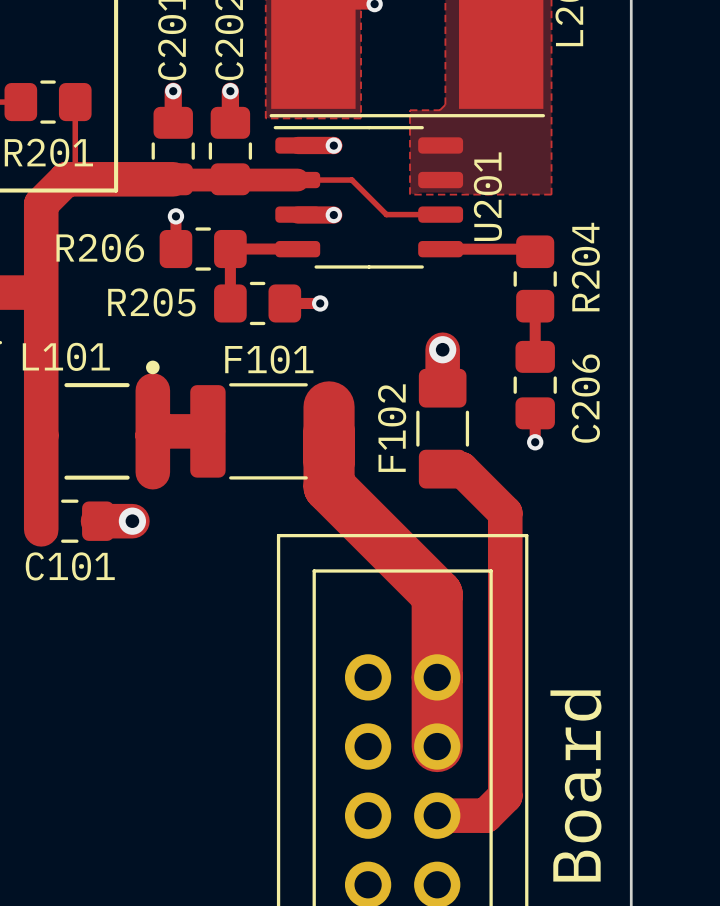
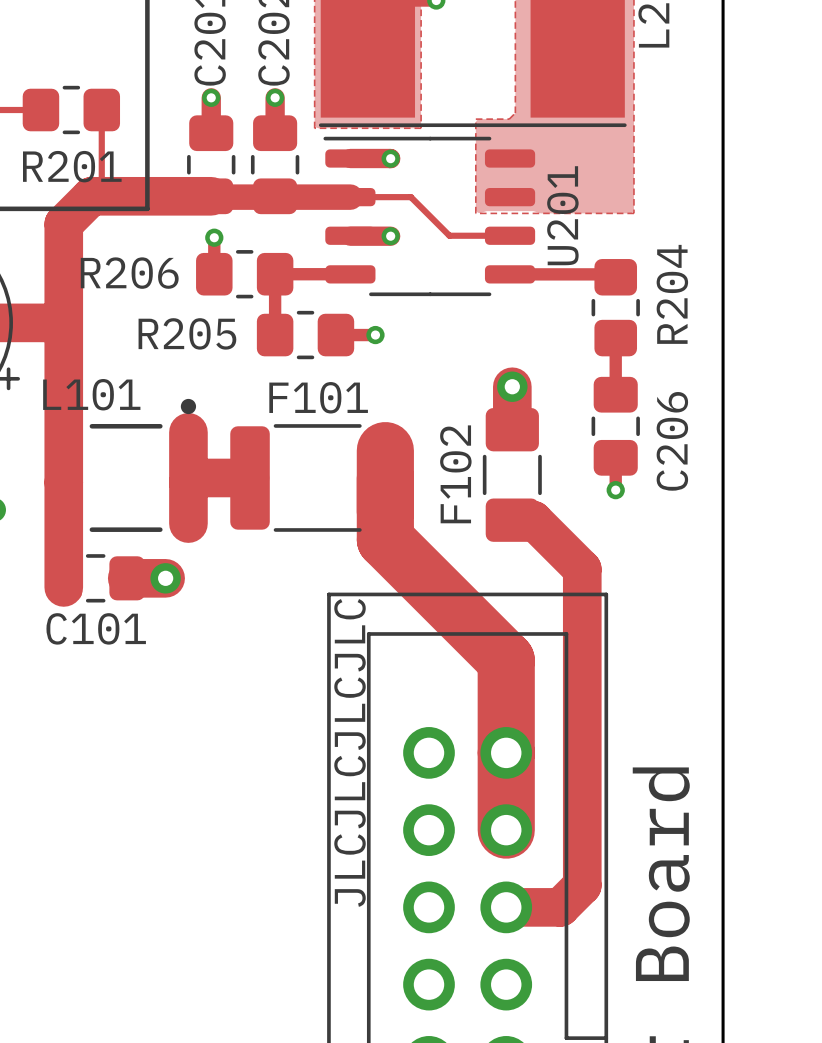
text: none -> JLCJLCJLCJLC (350, 752)

